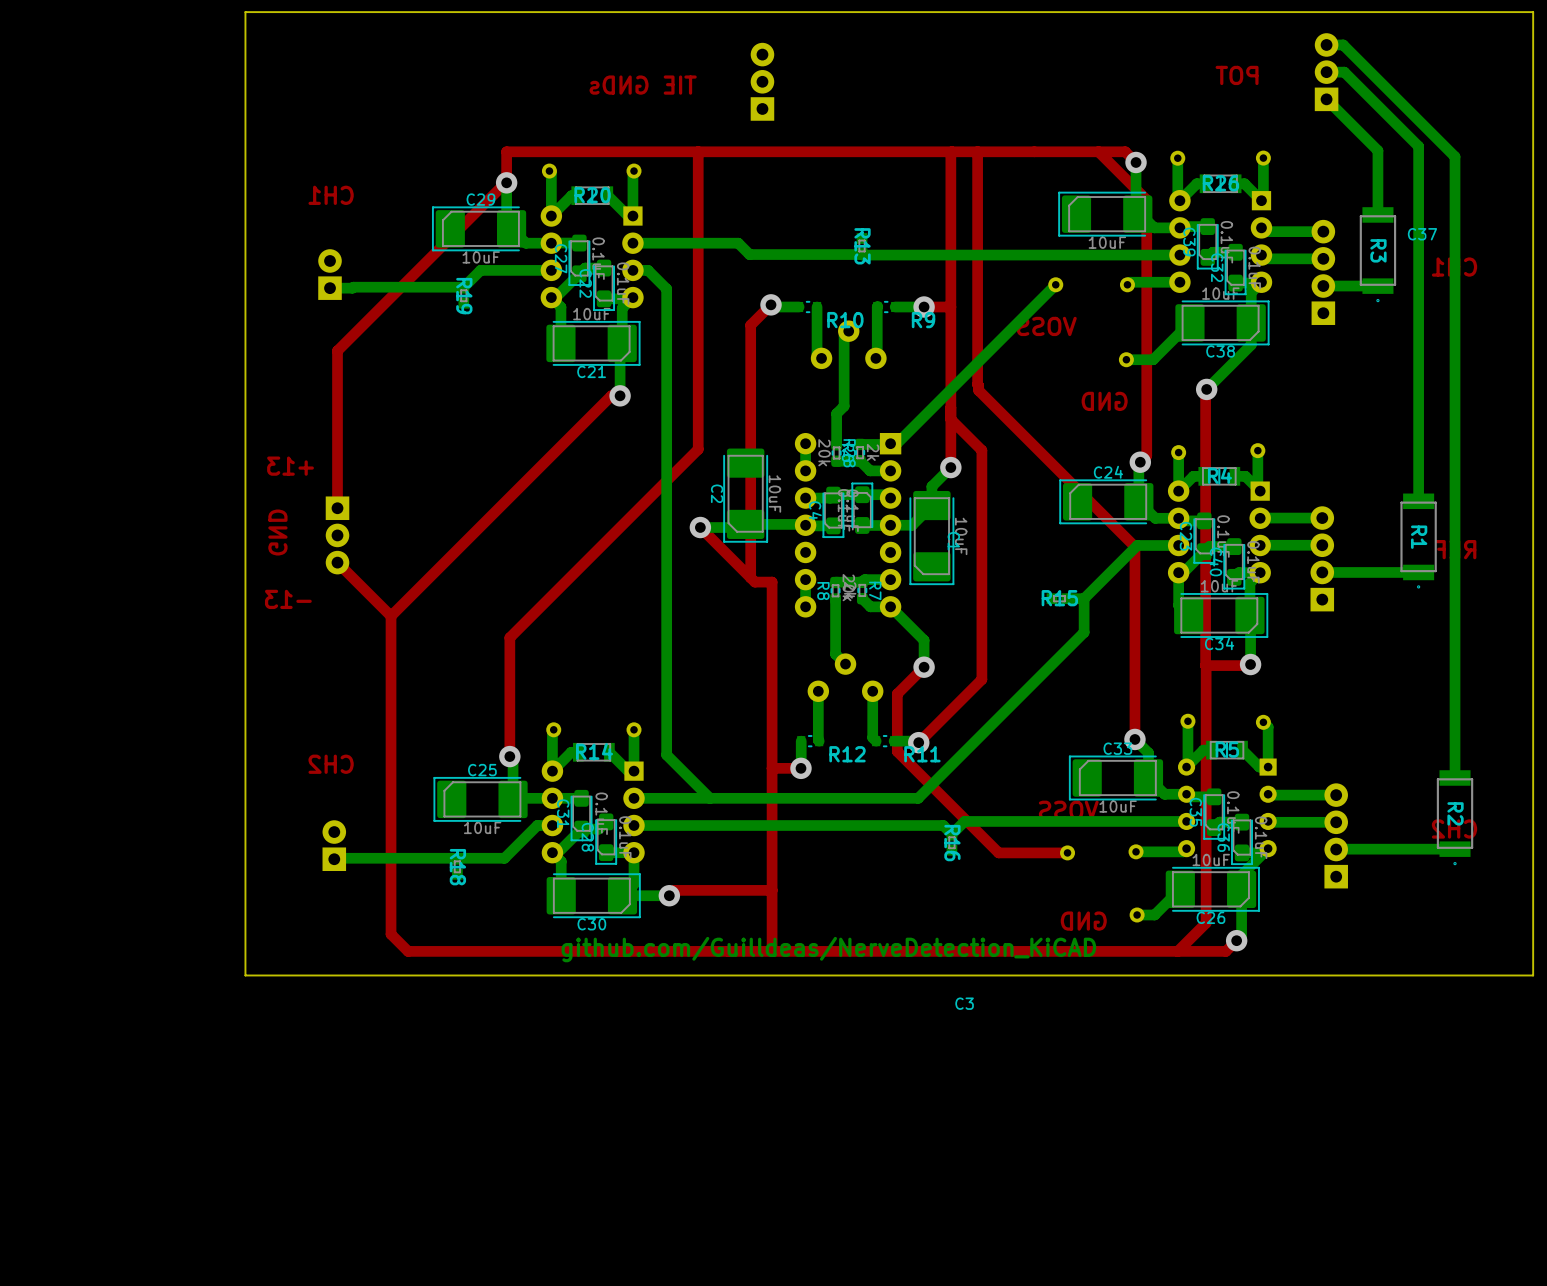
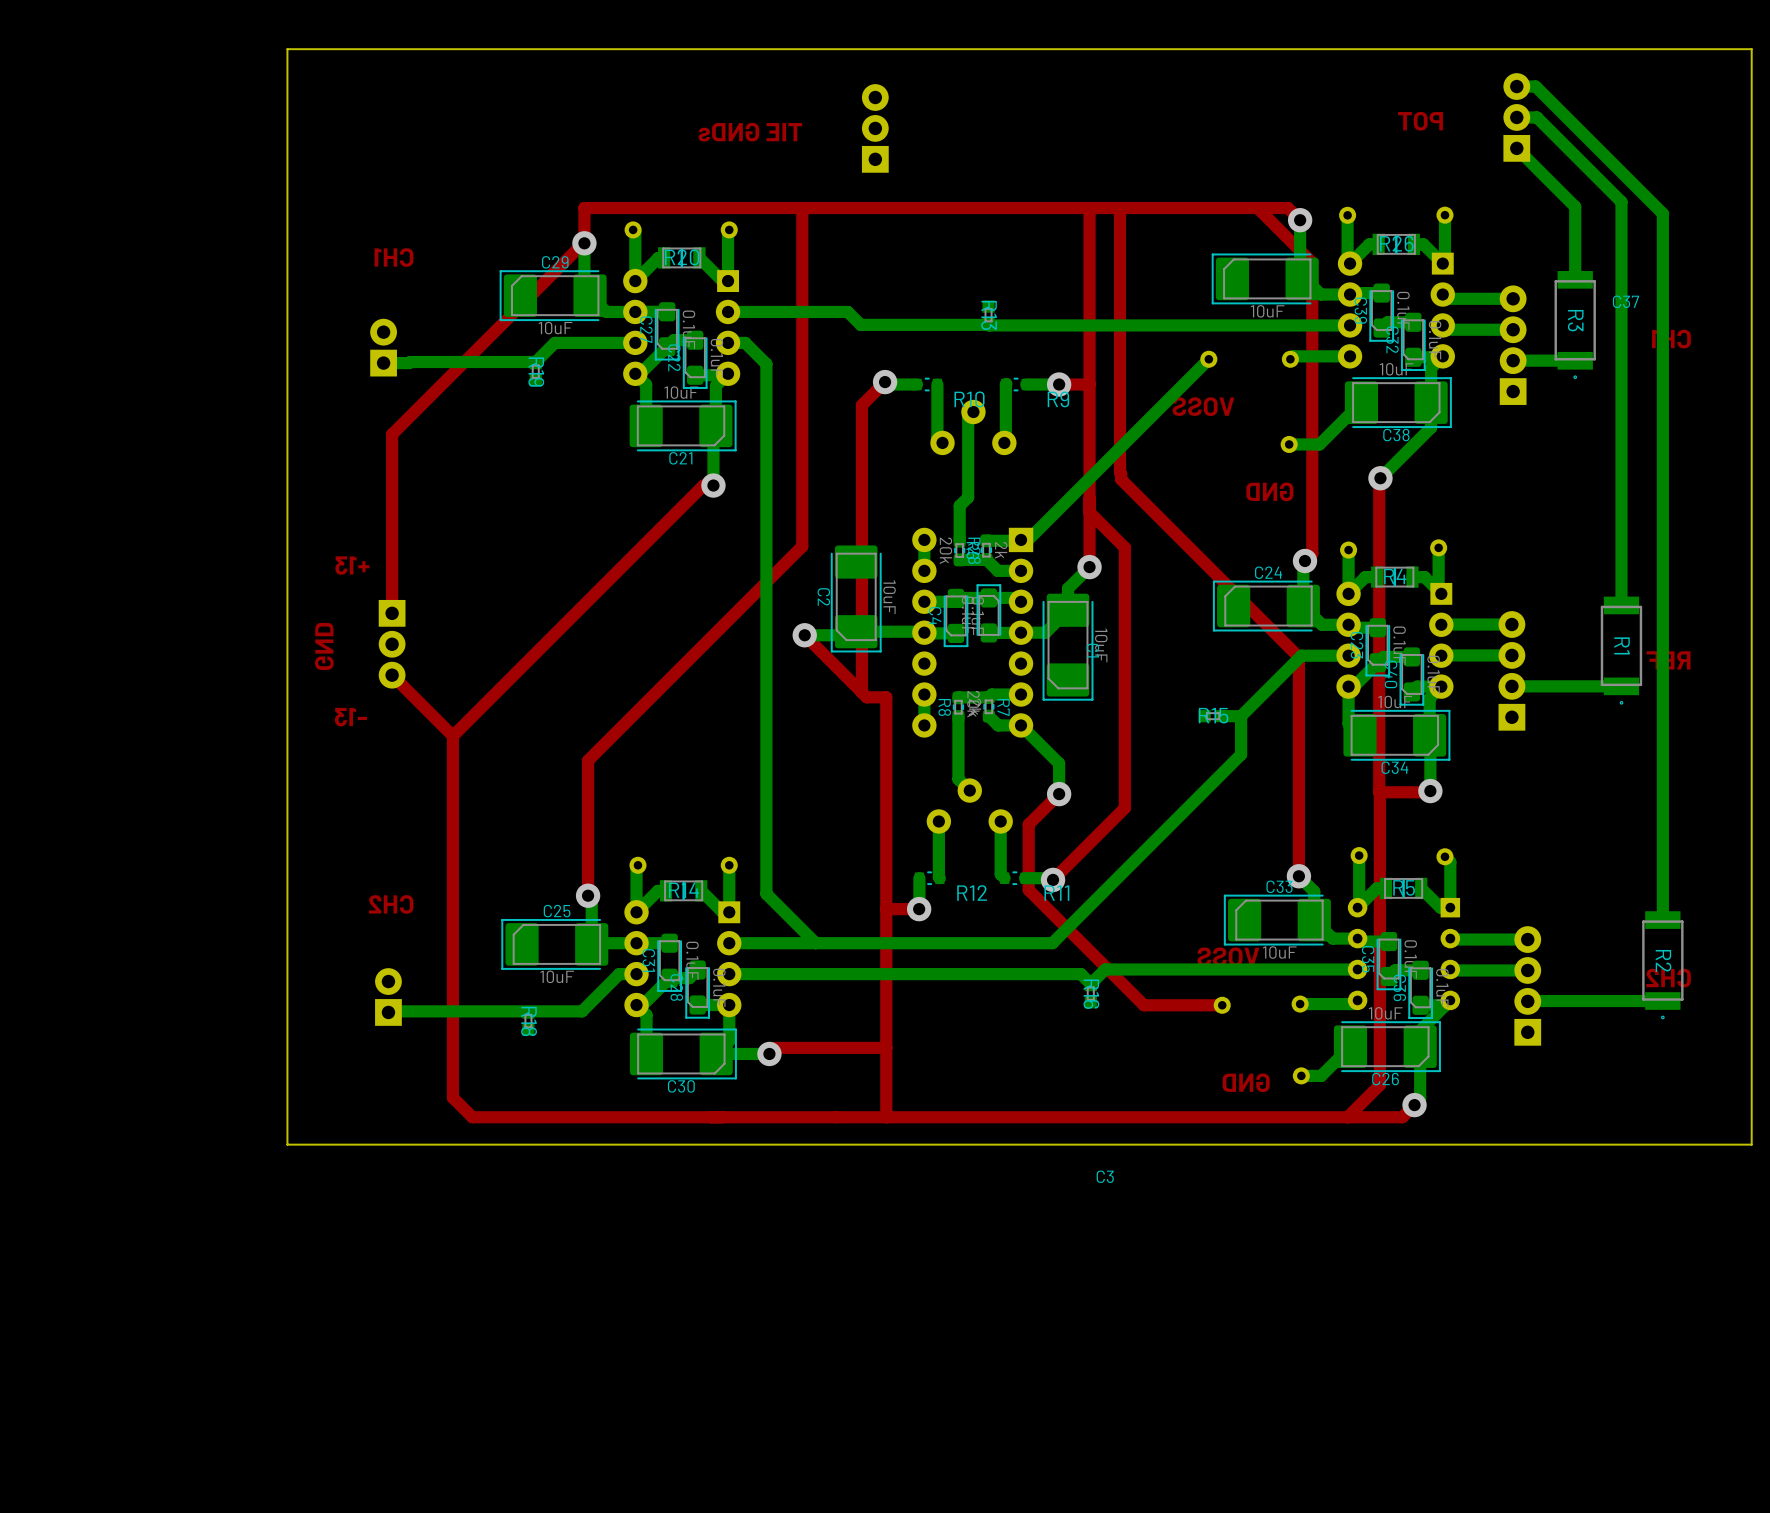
text: github.com/Guilldeas/NerveDetection_KiCAD (828, 949) -> none

